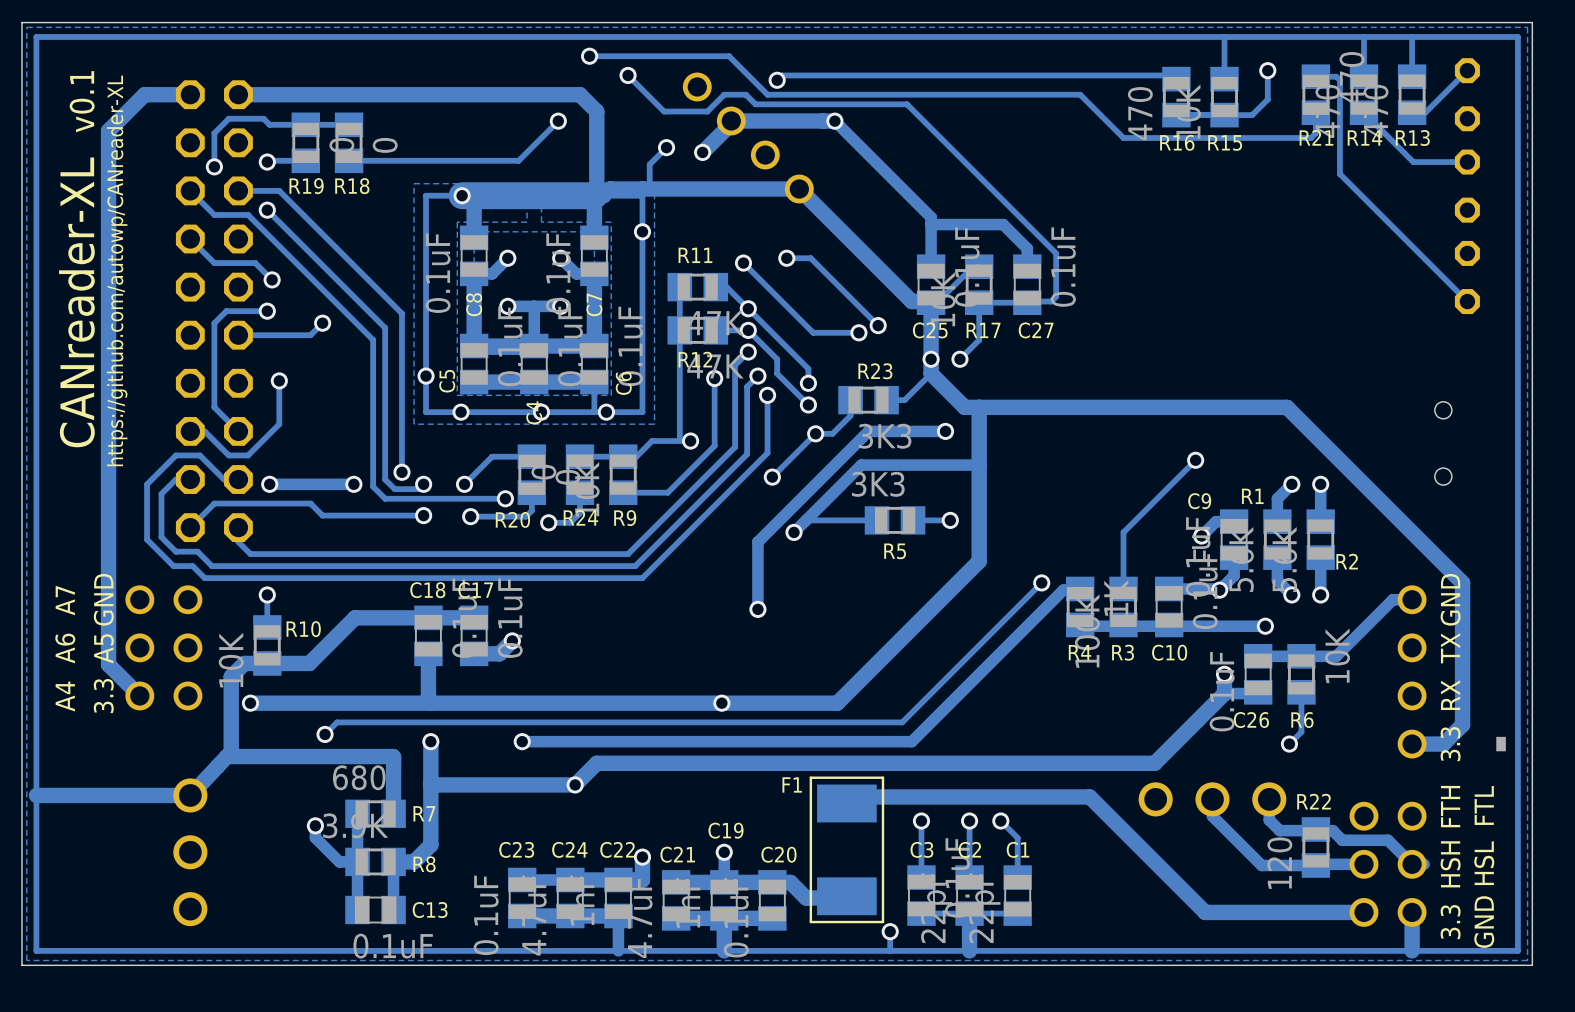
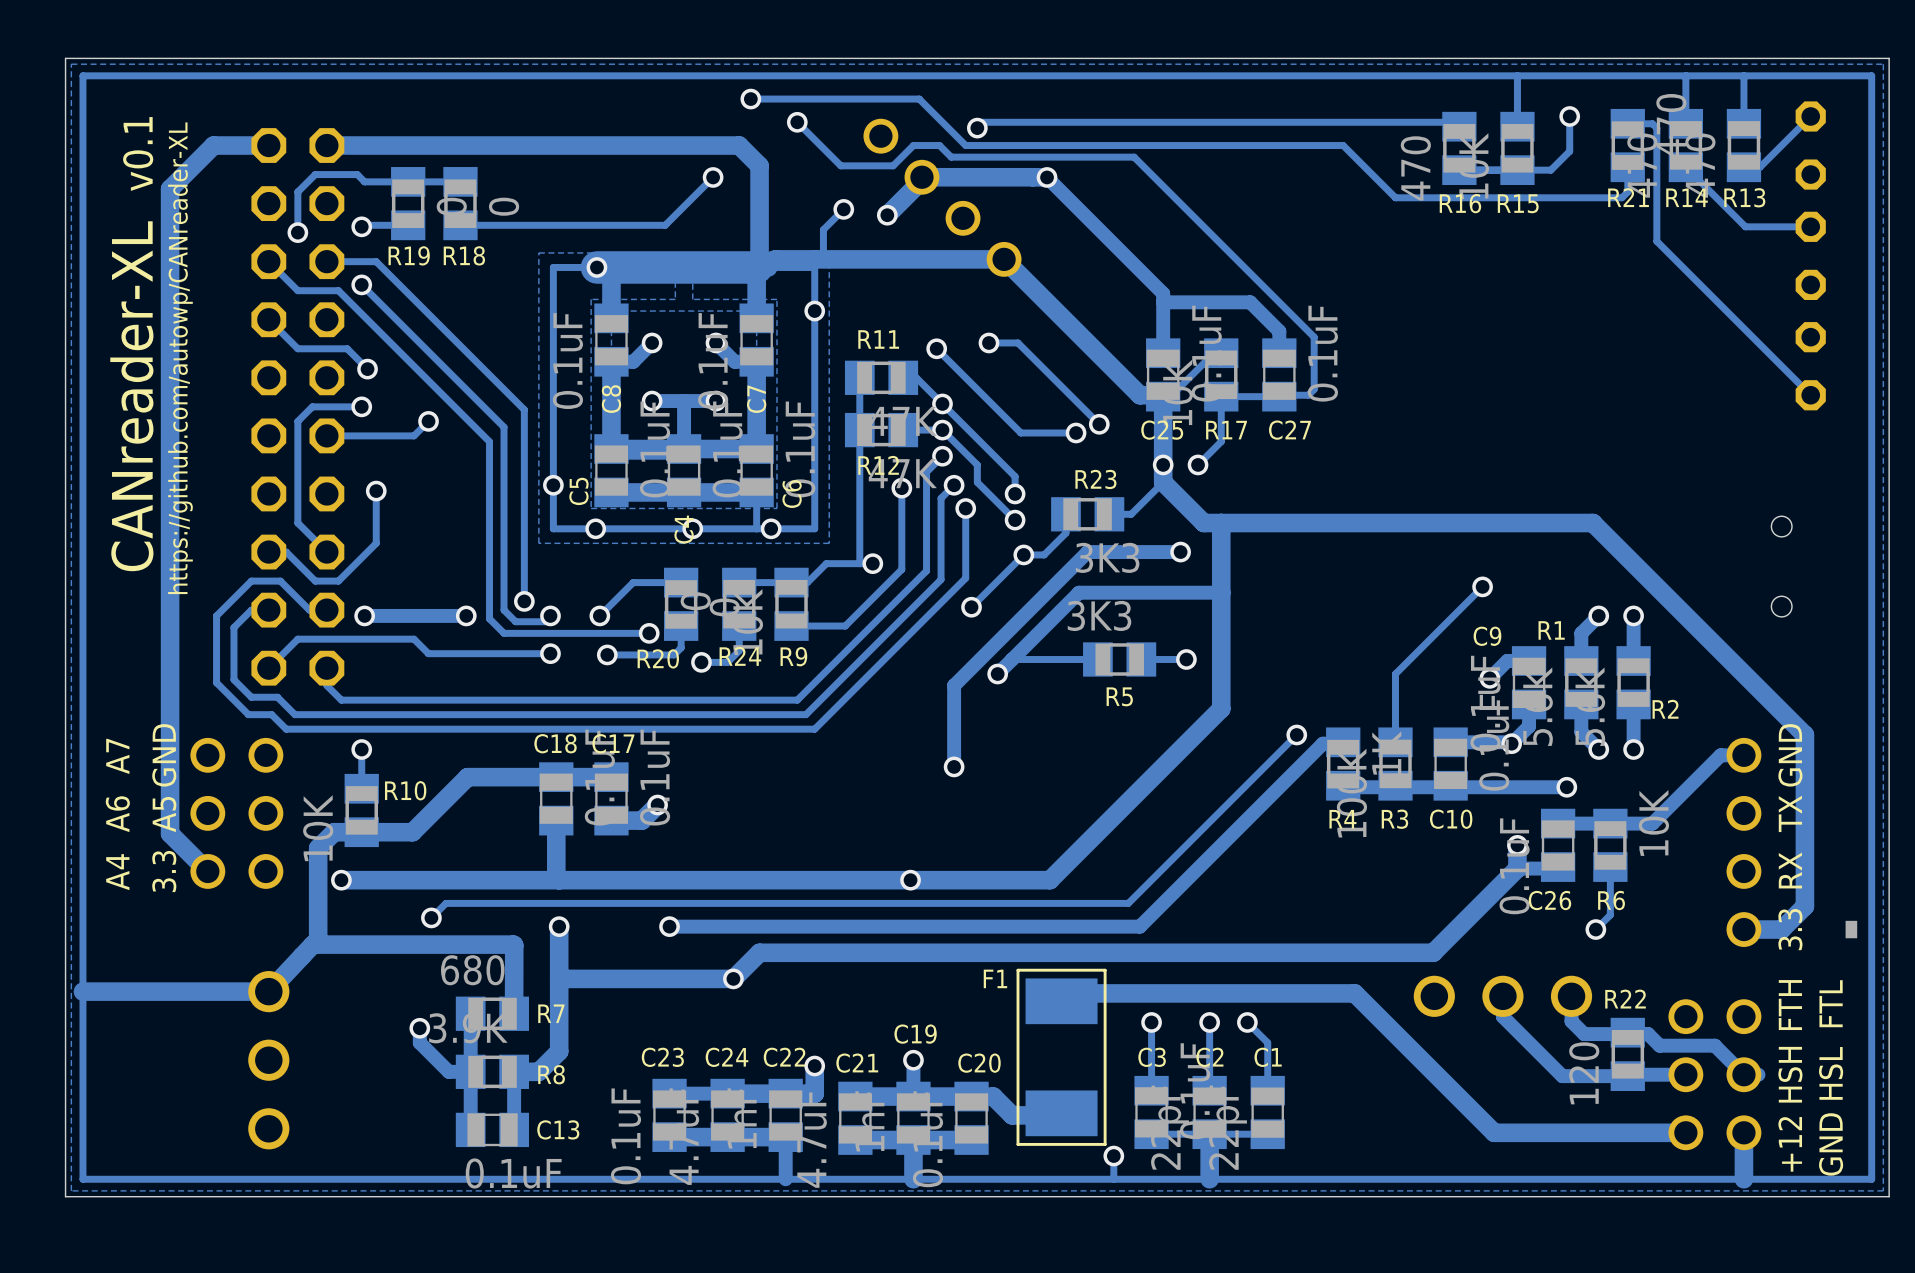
text: 3.3 (1450, 922) -> +12 (1790, 1144)

